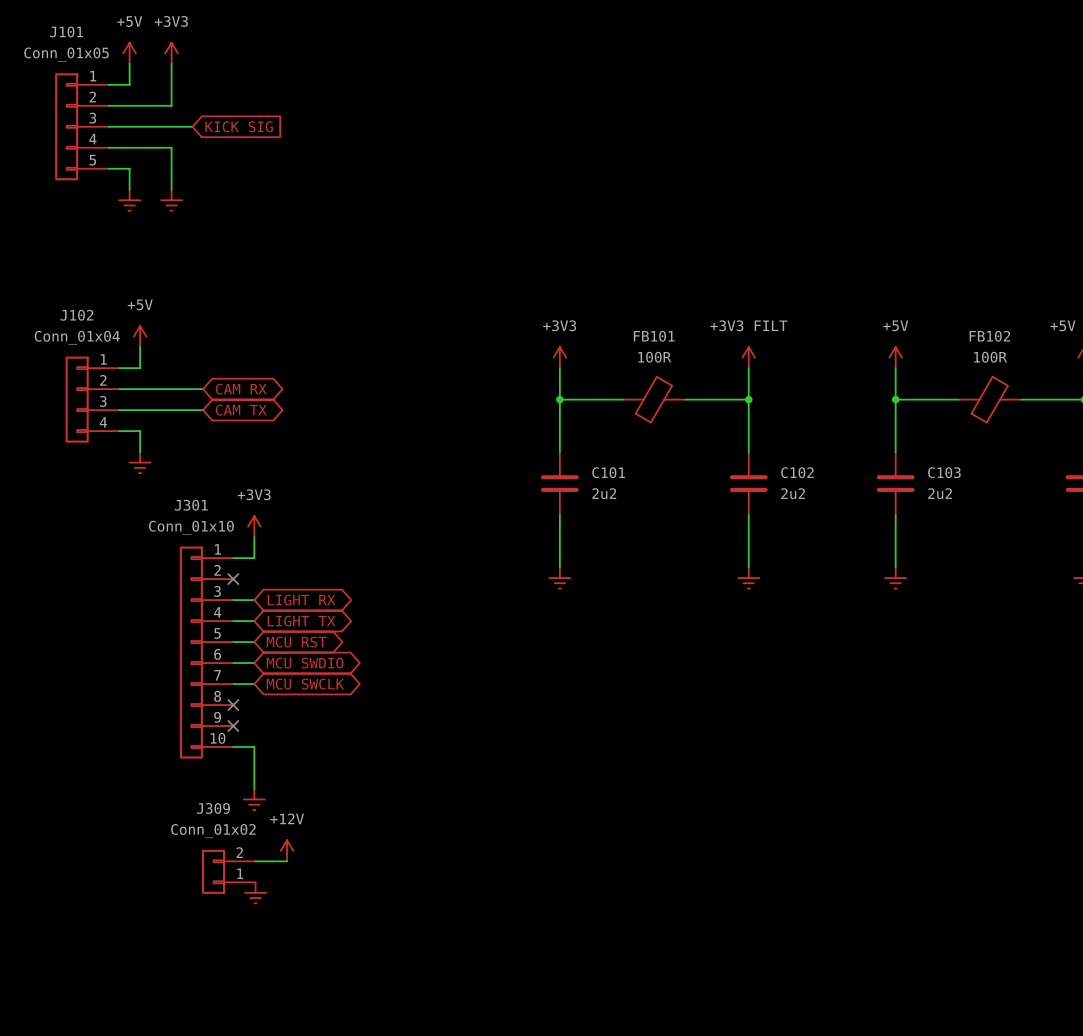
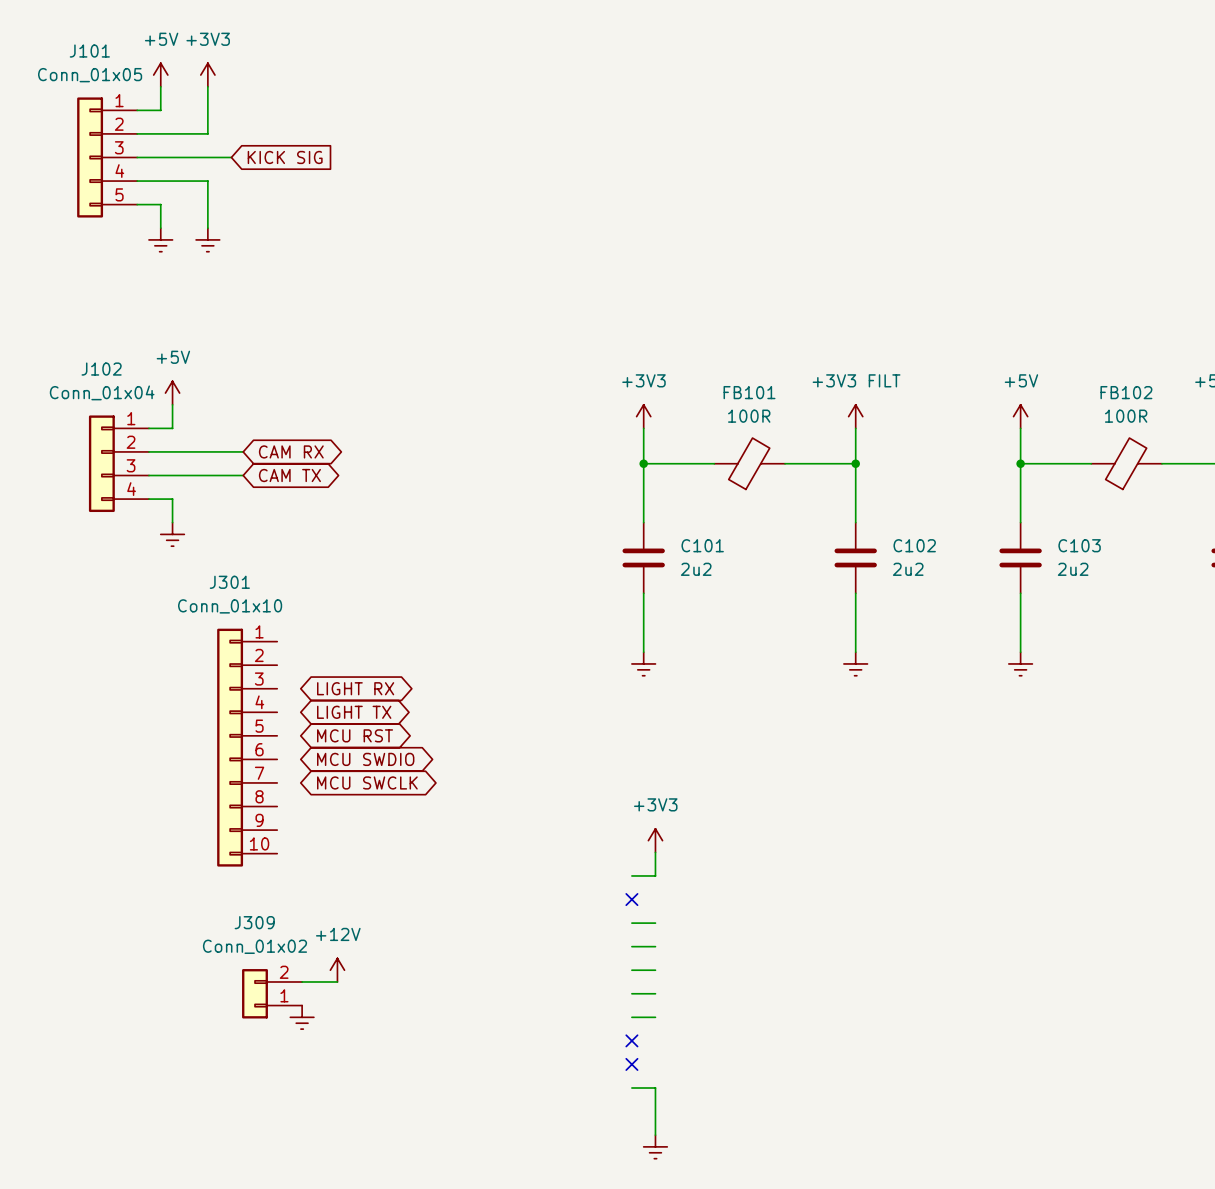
power symbol: +3V3 (254, 526) -> none
wire: (254, 537) (254, 558) (233, 558) -> none
no-connect mark: (233, 579) -> none
wire: (233, 600) (254, 600) -> none
wire: (233, 621) (254, 621) -> none
wire: (233, 642) (254, 642) -> none
wire: (233, 663) (254, 663) -> none
wire: (233, 684) (254, 684) -> none
no-connect mark: (233, 705) -> none
no-connect mark: (233, 726) -> none
power symbol: none -> +3V3 (655, 840)
wire: none -> (655, 852) (655, 875) (631, 875)
wire: (233, 746) (254, 746) (254, 788) -> none
no-connect mark: none -> (631, 899)
power symbol: (254, 799) -> none
wire: none -> (631, 923) (655, 923)
wire: none -> (631, 946) (655, 946)
wire: none -> (631, 970) (655, 970)
wire: none -> (631, 993) (655, 993)
wire: none -> (631, 1017) (655, 1017)
no-connect mark: none -> (631, 1040)
no-connect mark: none -> (631, 1064)
wire: none -> (631, 1088) (655, 1088) (655, 1135)
power symbol: none -> (655, 1146)

